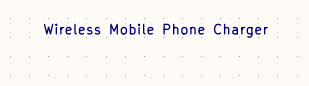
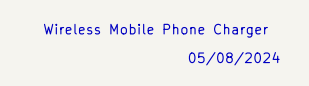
text: none -> 05/08/2024 (234, 58)

